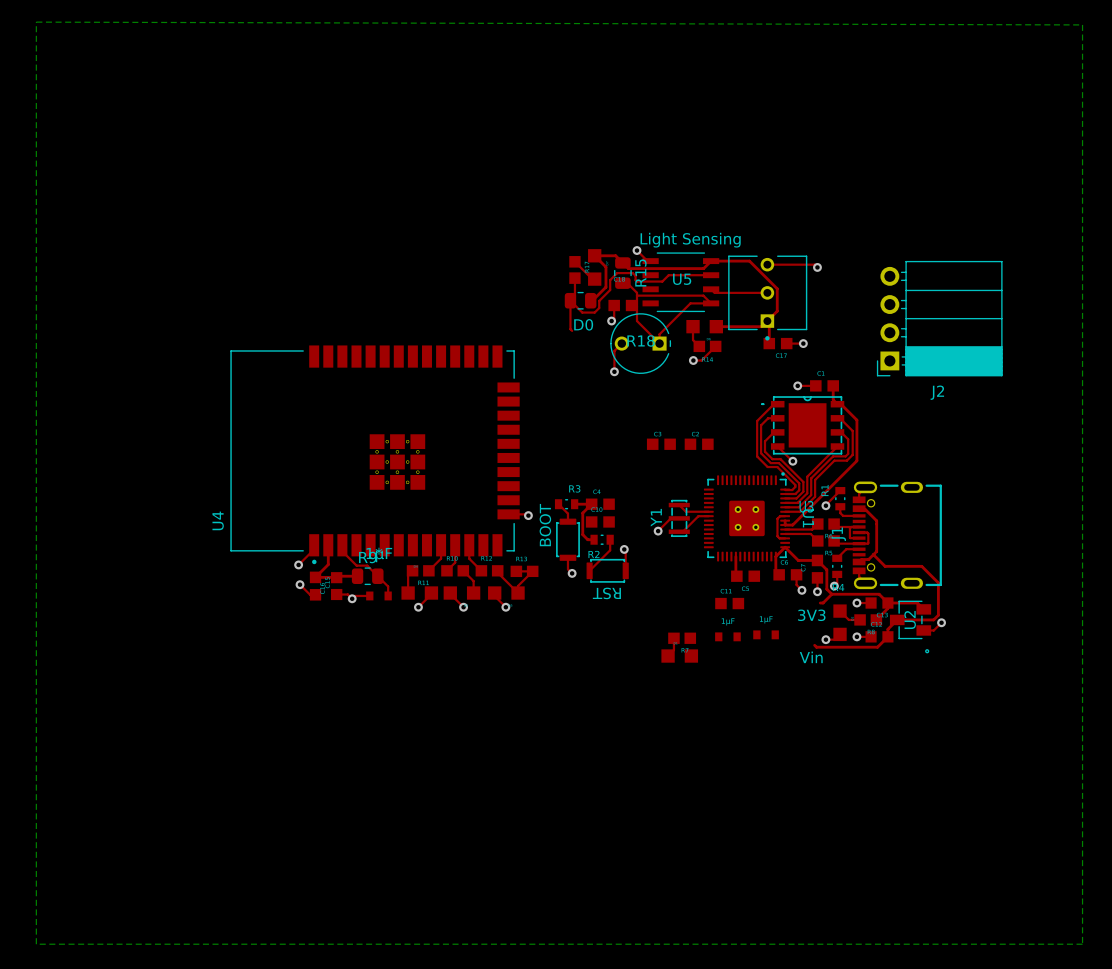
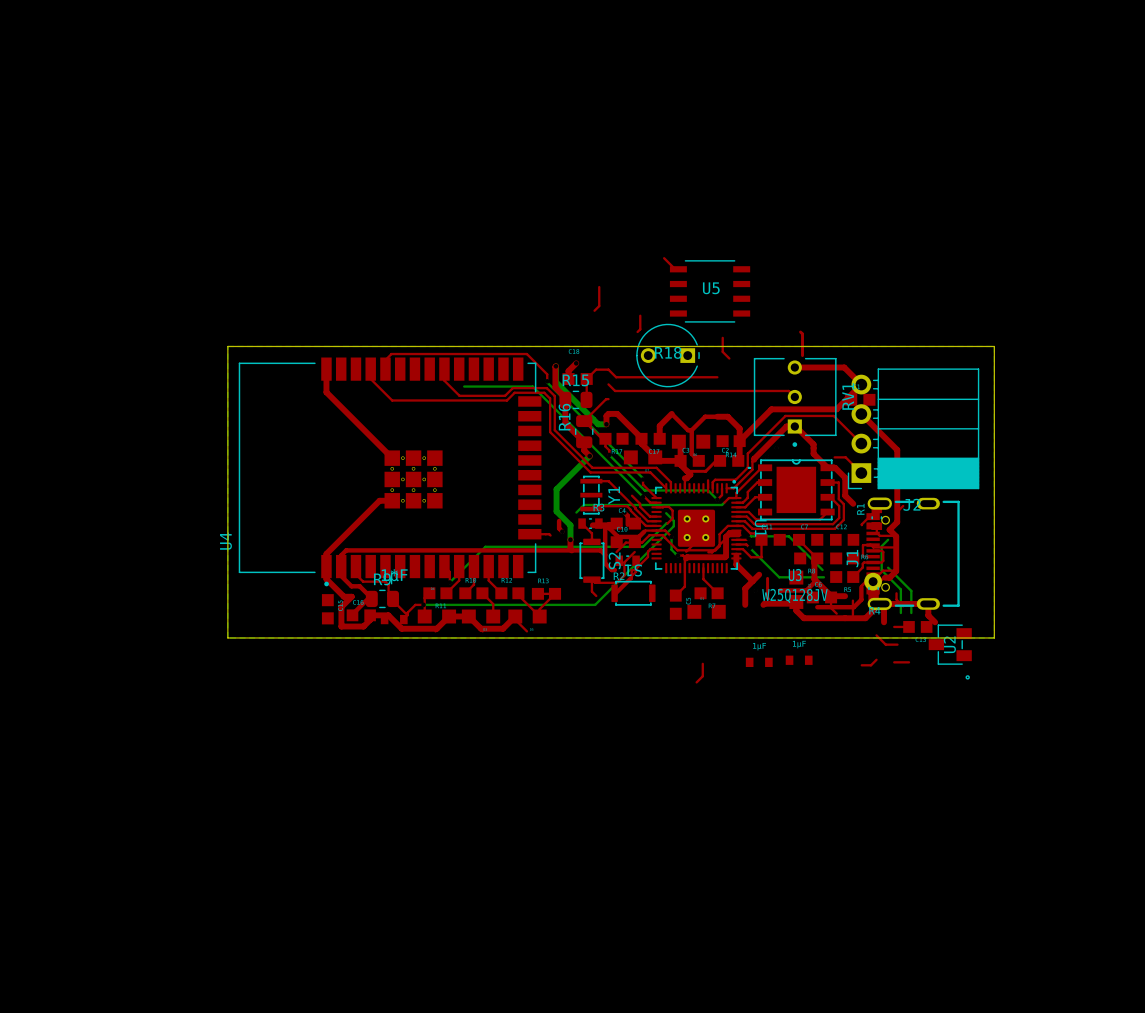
bottom zone outline: (36, 22) (36, 944) (1082, 944) (1082, 24) (36, 22) -> none
text: Light Sensing (690, 240) -> none
via: (636, 250) -> none
top track: (574, 261) (592, 279) (594, 279) -> none
top track: (767, 264) (814, 264) (817, 267) -> none
part rotation: 0° (594, 267) -> 90° clockwise (643, 457)
part position: (594, 267) -> (643, 457)
via: (817, 267) -> none
part rotation: 0° (574, 269) -> 90° clockwise (614, 438)
part position: (574, 269) -> (614, 438)
R15 rotation: 0° (622, 273) -> 90° clockwise (575, 399)
R15 position: (622, 273) -> (575, 399)
R15 name position: R15 (640, 273) -> R15 (575, 380)
top track: (711, 275) (668, 275) (662, 281) (636, 281) (632, 273) (617, 273) (610, 280) (610, 290) (599, 300) (599, 308) (594, 312) (582, 312) (570, 300) (570, 329) (572, 330) -> none
top track: (623, 283) (627, 283) (636, 292) (636, 321) (659, 343) (659, 334) (690, 303) (711, 303) (703, 295) (636, 295) -> none
top track: (711, 289) (714, 292) (767, 292) -> none
part: (767, 298) -> none
part: (580, 300) -> none
top track: (590, 300) (605, 287) (605, 267) (594, 255) (615, 255) (628, 268) (703, 268) (711, 261) (749, 261) (777, 288) (777, 311) (761, 326) (716, 326) -> none
part position: (622, 305) -> (577, 379)
J2 position: (939, 318) -> (913, 428)
via: (611, 321) -> none
text: D0 (583, 324) -> none
part position: (704, 326) -> (691, 441)
board edge: none -> (227, 346) (227, 637) (994, 637) (994, 346) (227, 346)
top track: (621, 343) (614, 350) (614, 371) -> none
part position: (777, 343) -> (650, 438)
top track: (786, 343) (803, 343) -> none
via: (803, 343) -> none
part position: (707, 346) -> (731, 441)
top track: (715, 346) (701, 360) (693, 360) -> none
top track: none -> (576, 363) (568, 371) (568, 379)
via: none -> (576, 363)
top track: none -> (555, 366) (555, 387) (565, 397) (565, 423) (584, 442) (584, 450) (589, 456)
bottom track: none -> (555, 366) (555, 382) (598, 424) (606, 424)
via: none -> (555, 366)
top track: none -> (794, 367) (844, 367) (861, 384) (836, 409) (771, 409) (739, 441)
top track: none -> (326, 369) (326, 392) (392, 458)
top track: none -> (370, 369) (370, 379) (392, 400) (506, 400) (514, 392) (544, 392) (550, 398) (550, 432) (590, 472) (650, 472) (666, 488)
top track: none -> (385, 369) (385, 360) (391, 354) (526, 354) (547, 374) (547, 381)
top track: none -> (444, 369) (444, 380) (459, 395) (505, 395) (512, 388) (546, 388) (554, 396) (554, 430) (592, 467) (656, 467) (670, 482) (670, 488)
via: (693, 360) -> none
top track: none -> (717, 377) (616, 377) (608, 369) (596, 369) (586, 379) (586, 399)
bottom track: none -> (547, 381) (643, 479)
via: none -> (547, 381)
top track: none -> (608, 384) (615, 390) (788, 390) (794, 397)
via: (614, 371) -> none
bottom track: none -> (464, 386) (532, 386) (643, 496)
top track: none -> (608, 399) (606, 399) (584, 421) (601, 438) (605, 438) (605, 446) (609, 450) (609, 455)
top track: (797, 385) (815, 385) -> none
via: (797, 385) -> none
top track: (833, 385) (833, 399) (837, 404) (841, 404) (856, 420) (856, 460) (792, 525) (785, 525) (785, 520) -> none
RV1: none -> (795, 402)
top track: none -> (861, 414) (897, 449) (897, 522) (889, 529) (896, 536) (896, 571) (889, 577) (883, 577) (879, 581) (866, 581) (861, 586) (861, 599) (853, 607) (817, 607)
top track: (777, 404) (773, 404) (757, 420) (757, 456) (767, 467) (777, 467) (795, 485) (792, 490) (785, 489) -> none
top track: none -> (606, 424) (606, 415) (608, 413) (617, 413) (641, 438) (641, 443) (658, 460) (680, 460) (684, 465)
via: none -> (606, 424)
top track: none -> (691, 430) (688, 430) (671, 413) (659, 425) (659, 438)
top track: none -> (691, 430) (691, 453) (698, 460)
top track: none -> (691, 430) (705, 416) (727, 416) (739, 428) (739, 456) (735, 460)
R16: none -> (584, 431)
top track: (777, 418) (768, 418) (761, 425) (761, 453) (770, 463) (778, 463) (799, 483) (799, 490) (795, 493) (785, 493) -> none
top track: (837, 418) (840, 418) (852, 431) (852, 454) (846, 460) (834, 460) (815, 479) (815, 496) (800, 511) (785, 511) -> none
top track: none -> (678, 441) (680, 443) (680, 464) (690, 474) (684, 478) (684, 488)
U3 position: (802, 425) -> (791, 489)
top track: none -> (861, 443) (833, 415) (785, 415) (747, 453) (747, 467) (735, 479) (715, 479) (712, 482) (712, 488)
top track: (777, 432) (773, 432) (764, 441) (764, 451) (772, 459) (780, 459) (803, 481) (803, 491) (796, 498) (785, 498) -> none
top track: (837, 432) (841, 432) (848, 439) (848, 453) (845, 456) (833, 456) (811, 478) (811, 495) (798, 507) (785, 507) -> none
bottom track: none -> (609, 455) (644, 490) (708, 490) (717, 499)
via: none -> (609, 455)
bottom track: none -> (589, 456) (556, 489) (556, 511) (570, 525) (570, 539)
via: none -> (589, 456)
top track: none -> (834, 457) (845, 457) (861, 473)
top track: none -> (717, 460) (705, 471) (687, 471)
top track: (777, 446) (792, 461) -> none
top track: (837, 446) (807, 476) (807, 493) (797, 502) (785, 502) -> none
top track: none -> (765, 467) (761, 467) (736, 492) (736, 498) (728, 498) (724, 502)
top track: none -> (827, 467) (813, 453) (813, 444) (795, 426) (786, 426) (754, 458) (752, 469) (733, 488) (726, 488)
top track: none -> (827, 467) (835, 467) (845, 477) (845, 495) (853, 503)
via: (792, 461) -> none
top track: none -> (643, 479) (643, 484) (656, 498)
via: none -> (643, 479)
top track: none -> (708, 480) (708, 488)
top track: none -> (591, 481) (608, 481) (647, 521) (656, 521)
top track: none -> (765, 482) (757, 482) (747, 492) (747, 497) (742, 502) (736, 502)
top track: none -> (827, 482) (838, 482) (838, 499) (843, 504) (843, 519) (834, 528) (752, 528) (744, 521) (736, 521)
top track: none -> (722, 488) (722, 495) (717, 499)
top track: none -> (632, 495) (650, 516) (656, 516)
top track: none -> (643, 496) (650, 502) (656, 502)
via: none -> (643, 496)
top track: none -> (765, 497) (755, 497) (745, 507) (736, 507)
top track: none -> (827, 497) (830, 497) (839, 506) (839, 517) (833, 524) (754, 524) (746, 516) (736, 516)
via: none -> (717, 499)
J1 footprint: [852, 481, 942, 590] -> [864, 497, 960, 611]
top track: none -> (392, 500) (379, 500) (326, 553) (326, 566)
bottom track: none -> (724, 502) (722, 505) (583, 505) (576, 512)
top track: none -> (656, 507) (668, 506) (672, 510) (672, 518) (667, 523)
top track: none -> (591, 509) (594, 506) (627, 506) (645, 525) (656, 525)
top track: none -> (624, 512) (627, 515) (627, 524)
via: none -> (624, 512)
top track: none -> (736, 511) (748, 511) (756, 519) (820, 519) (827, 512)
bottom track: none -> (666, 513) (673, 520) (673, 526) (595, 604) (423, 604)
top track: none -> (559, 520) (559, 528) (562, 531)
top track: (574, 504) (591, 504) (582, 513) (582, 534) (587, 539) (594, 539) -> none
bottom track: none -> (667, 523) (643, 546) (485, 546) (449, 582)
top track: none -> (609, 524) (592, 525)
top track: none -> (609, 524) (609, 528) (618, 536) (638, 536) (645, 530) (665, 530) (671, 536)
top track: none -> (609, 524) (605, 529) (605, 563) (611, 570) (614, 570)
top track: (679, 505) (685, 511) (708, 511) -> none
via: (825, 505) -> none
top track: (859, 508) (864, 508) (876, 520) (876, 551) (868, 559) (861, 559) (859, 561) -> none
via: none -> (562, 531)
top track: none -> (738, 532) (730, 532) (726, 536) (725, 557) (686, 558)
via: (528, 515) -> none
bottom track: none -> (671, 536) (671, 549) (677, 555)
via: none -> (671, 536)
U1 position: (746, 516) -> (696, 526)
top track: (785, 516) (780, 516) (777, 518) (777, 536) (785, 538) -> none
top track: none -> (665, 537) (662, 535) (649, 535) (642, 542) (625, 542) (616, 552)
top track: none -> (665, 537) (677, 550) (715, 550) (719, 546) (719, 534) (727, 525) (742, 525) (750, 533) (755, 533) (761, 539) (762, 557) (751, 557) (742, 549) (736, 549)
Y1 name position: Y1 (656, 517) -> Y1 (614, 495)
Y1 position: (679, 518) -> (591, 495)
top track: none -> (748, 538) (736, 539)
bottom track: none -> (748, 538) (751, 536) (788, 536) (822, 570)
via: none -> (748, 538)
top track: none -> (570, 539) (571, 550)
via: none -> (570, 539)
top track: none -> (799, 539) (817, 558) (814, 561) (814, 579) (831, 596) (845, 596)
bottom track: none -> (888, 539) (881, 546) (881, 570) (900, 589) (900, 613)
top track: none -> (736, 544) (746, 544) (749, 547)
top track: (817, 524) (812, 529) (785, 529) -> none
part position: (825, 524) -> (844, 558)
top track: none -> (873, 545) (862, 545) (863, 556)
S2 value: BOOT (545, 525) -> none
bottom track: none -> (749, 547) (779, 577) (823, 577)
via: none -> (749, 547)
top track: (851, 527) (849, 537) (859, 538) -> none
top track: none -> (656, 549) (650, 549) (647, 551) (647, 556) (634, 570) (631, 570) (631, 578) (615, 595)
top track: none -> (873, 550) (882, 550) (883, 560) (864, 562) (862, 567) (853, 577)
top track: none -> (634, 552) (624, 562) (624, 575) (616, 582) (595, 582) (591, 579)
via: (658, 531) -> none
top track: (859, 532) (868, 533) (867, 543) (836, 543) (834, 540) -> none
top track: (785, 533) (810, 533) (817, 540) -> none
top track: none -> (605, 554) (600, 550) (346, 550) (341, 555) (341, 566)
top track: none -> (677, 555) (683, 555) (686, 558)
via: none -> (677, 555)
top track: none -> (736, 555) (736, 564) (752, 581)
top track: none -> (686, 558) (684, 586) (675, 595)
S2 name: none -> S2 (614, 560)
part position: (825, 540) -> (844, 577)
top track: none -> (444, 566) (449, 571) (449, 582)
top track: none -> (703, 568) (703, 579) (717, 593)
bottom track: none -> (888, 567) (911, 590) (911, 613)
top track: (314, 549) (298, 564) -> (326, 570) (326, 579) (344, 596) (351, 596) (341, 607) (341, 626) (363, 626) (370, 619) (370, 615) (388, 615) (401, 628) (436, 628) (449, 616) (468, 616) (481, 628) (503, 628) (515, 616)
S1 name: none -> S1 (633, 570)
top track: (624, 549) (625, 570) -> none
via: (624, 549) -> none
top track: (342, 551) (356, 565) (367, 565) (388, 586) (388, 595) -> (355, 572) (363, 581) (385, 581) (388, 584) (388, 596) (407, 615) (407, 612) (415, 604) (423, 604)
top track: none -> (759, 574) (745, 588) (745, 604)
top track: (328, 554) (328, 564) (315, 577) (357, 576) -> (341, 575) (351, 586) (359, 586) (369, 596) (352, 615)
top track: (873, 554) (885, 566) (921, 566) (938, 582) (938, 615) (933, 619) (897, 619) (887, 629) (887, 636) (877, 647) (816, 647) (814, 645) -> none
top track: none -> (814, 579) (814, 582) (806, 590) (780, 590)
via: none -> (449, 582)
via: (298, 564) -> none
part rotation: 0° (817, 569) -> 90° clockwise (808, 539)
part position: (817, 569) -> (808, 539)
via: (572, 573) -> none
U3 value: none -> W25Q128JV (794, 595)
top track: (779, 574) (775, 571) (775, 556) (785, 547) (798, 560) (817, 560) (826, 569) (826, 589) (831, 594) -> none
part rotation: 0° (745, 576) -> 90° clockwise (675, 604)
part position: (745, 576) -> (675, 604)
via: none -> (423, 604)
top track: none -> (879, 603) (884, 608) (884, 622)
top track: none -> (879, 603) (928, 603) (928, 615) (935, 622)
top track: none -> (879, 603) (865, 618) (803, 618) (796, 610) (796, 601) (794, 603) (763, 604)
top track: (300, 584) (310, 594) (315, 594) -> none
via: (300, 584) -> none
part rotation: 0° (336, 586) -> 90° clockwise (361, 615)
via: (834, 586) -> none
via: (801, 590) -> none
via: (817, 591) -> none
S1 value: RST (606, 593) -> none
top track: (336, 594) (347, 594) (352, 598) (355, 595) (369, 595) -> none
top track: (831, 594) (879, 594) (887, 603) -> none
top track: (831, 594) (823, 603) (820, 603) -> none
via: (352, 598) -> none
part position: (729, 603) -> (770, 539)
via: (856, 603) -> none
top track: (887, 603) (917, 603) (923, 609) -> none
top track: (887, 603) (887, 608) (876, 619) -> none
via: (418, 607) -> none
via: (463, 607) -> none
via: (505, 607) -> none
text: 3V3 (811, 615) -> none
part position: (868, 619) -> (808, 558)
part position: (840, 622) -> (796, 589)
top track: (941, 622) (933, 630) (923, 630) -> none
via: (941, 622) -> none
via: (856, 636) -> none
part position: (879, 636) -> (844, 539)
part position: (682, 638) -> (709, 593)
via: (825, 639) -> none
part position: (679, 656) -> (706, 611)
text: Vin (811, 657) -> none

